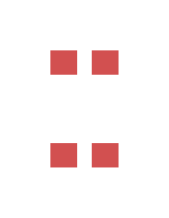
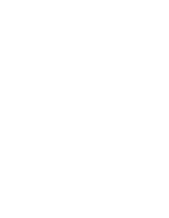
part: (84, 62) -> none
part: (84, 155) -> none

